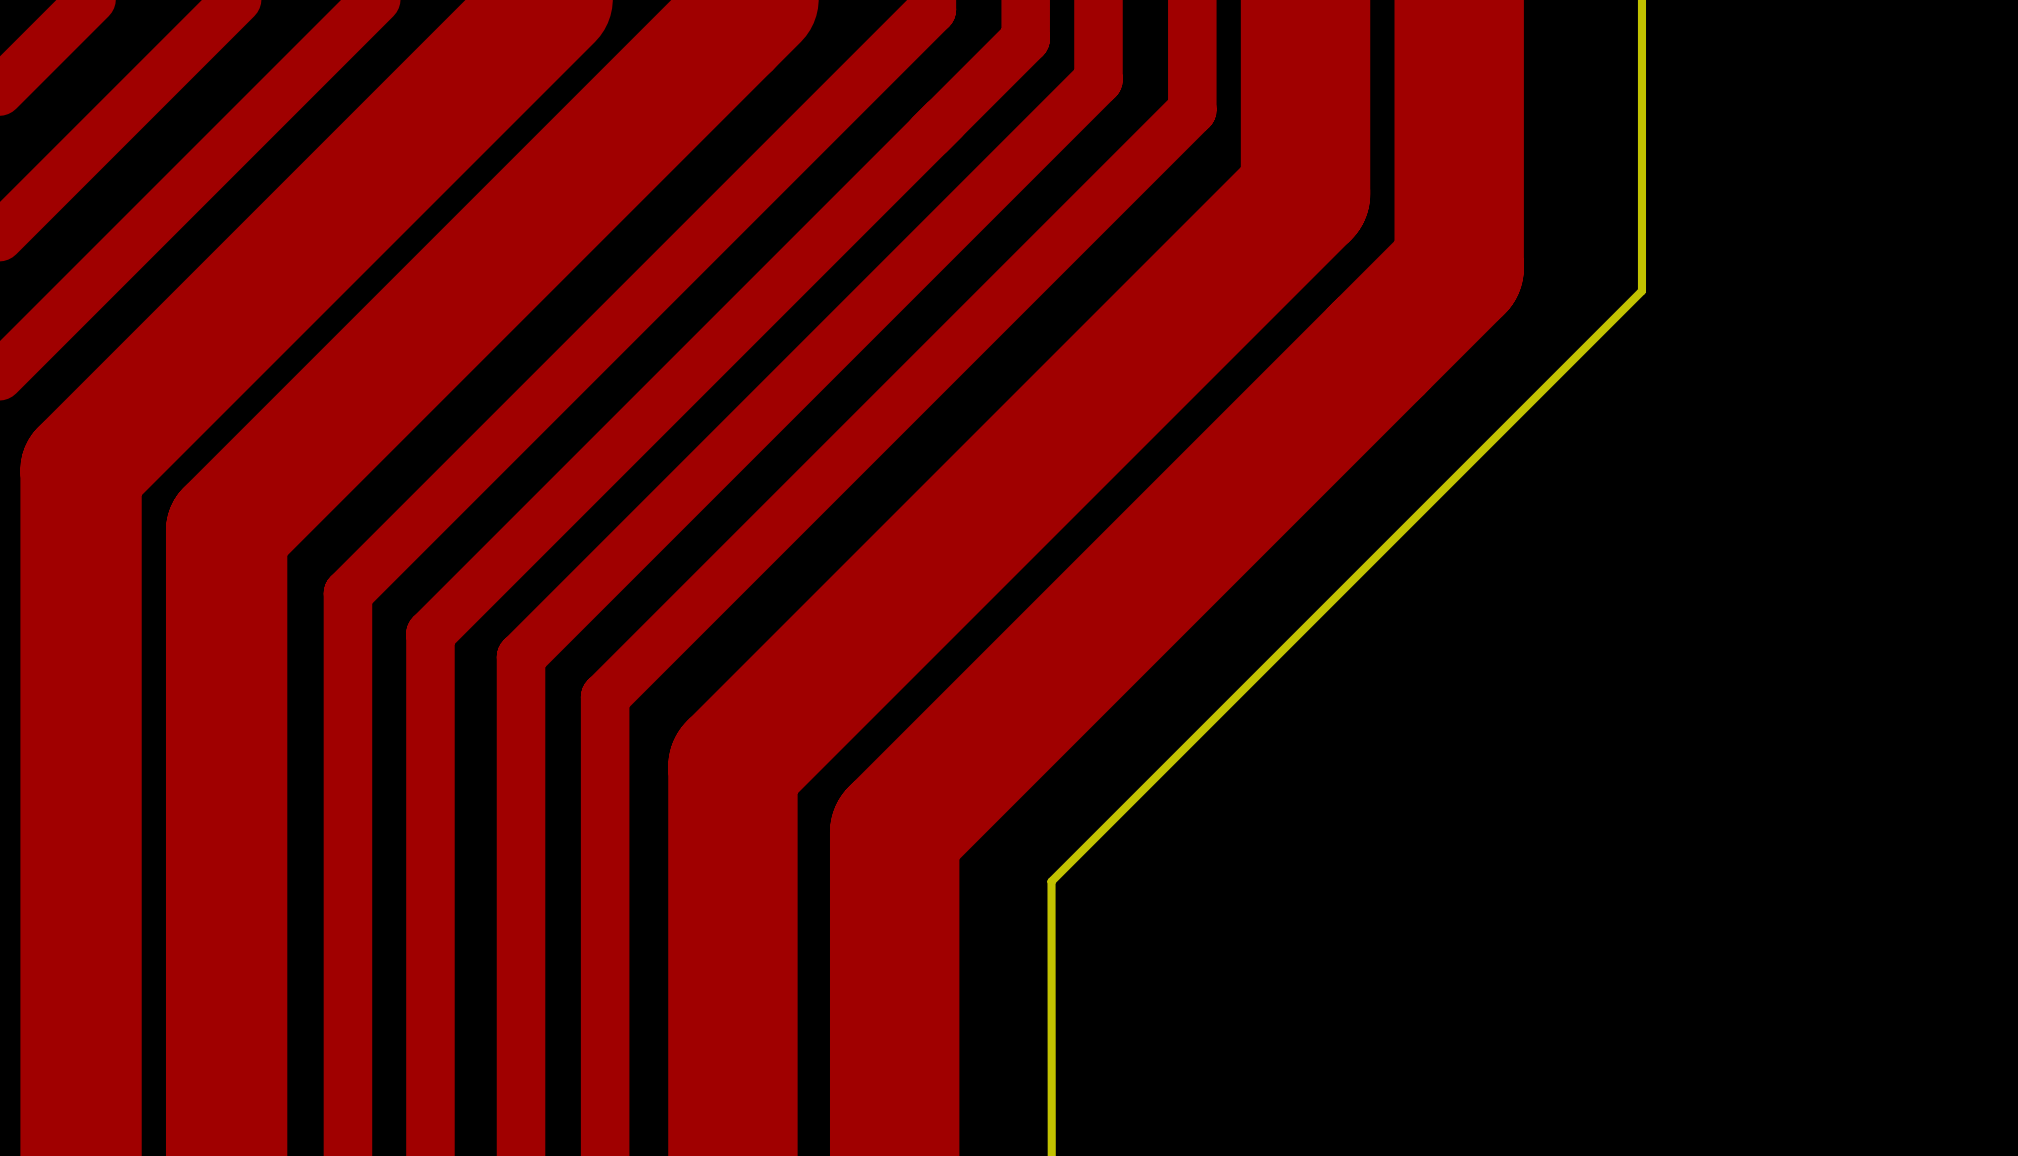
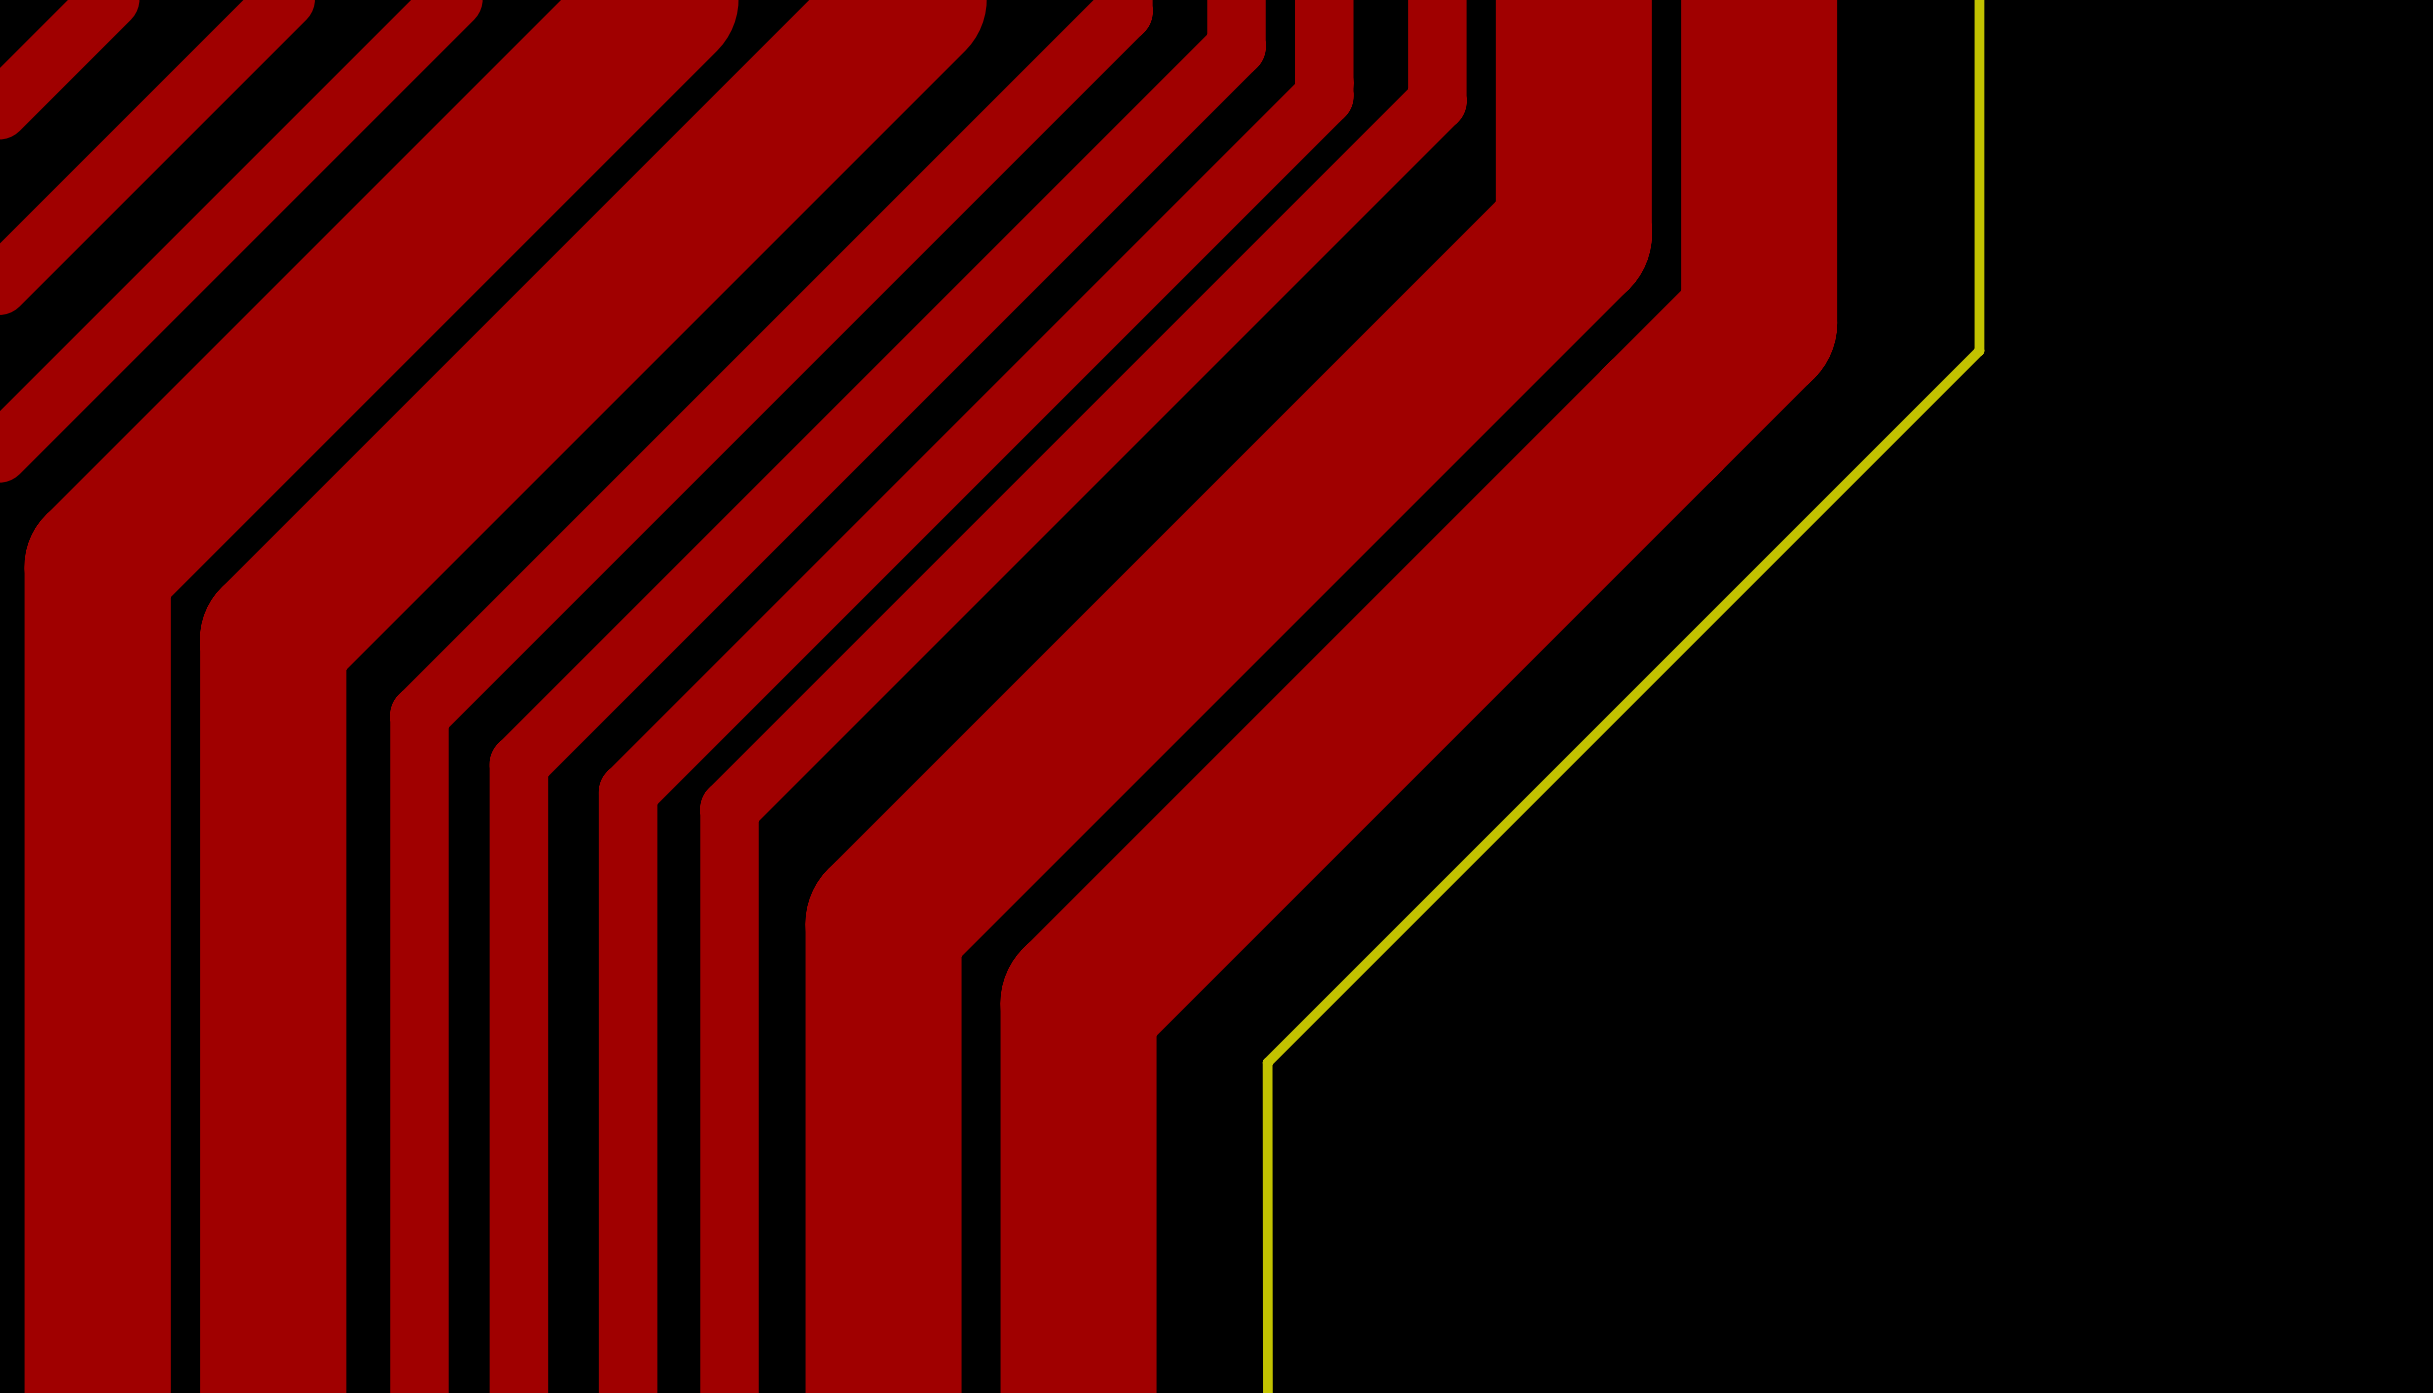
top track: (1192, 83) (1192, 109) (605, 697) -> (1437, 101) (729, 809) (729, 840)

